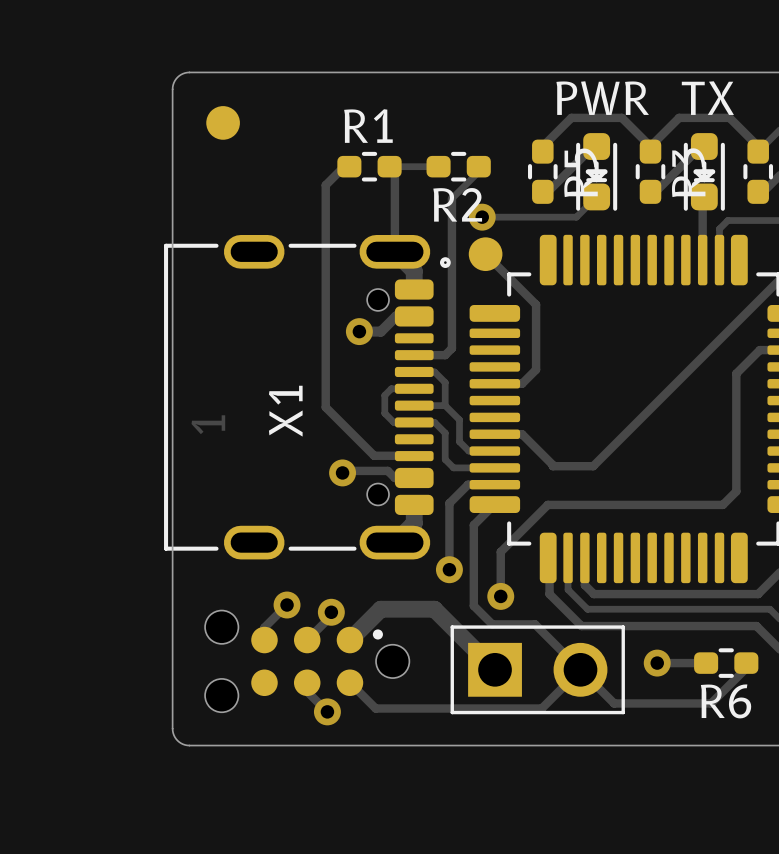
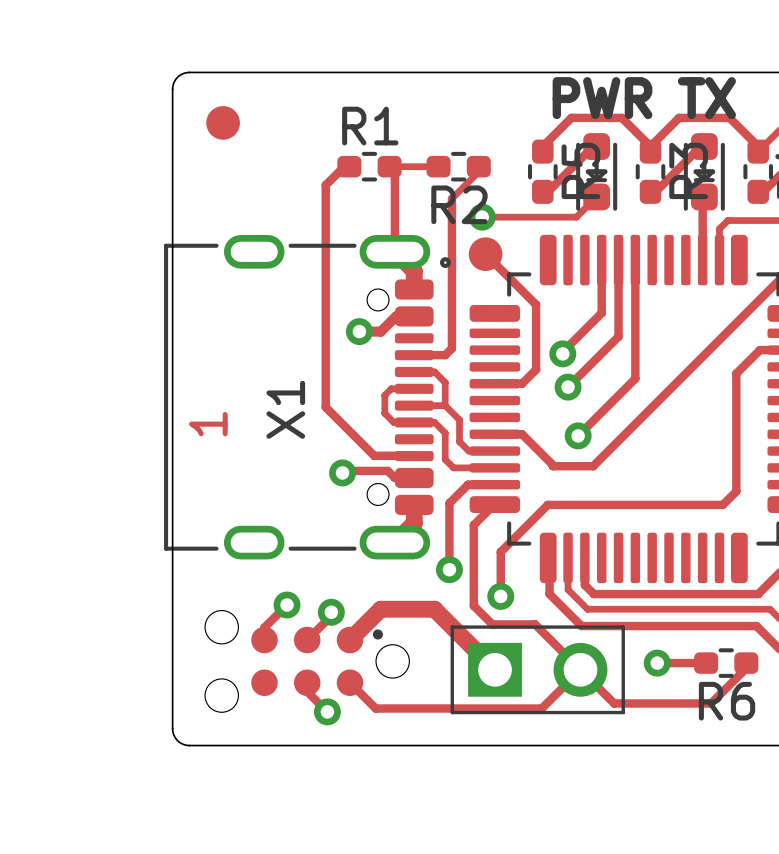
track: none -> (601, 260) (601, 313) (562, 353)
track: none -> (618, 260) (618, 336) (568, 387)
track: none -> (635, 260) (635, 378) (578, 435)
via: none -> (562, 353)
via: none -> (568, 387)
via: none -> (578, 435)

